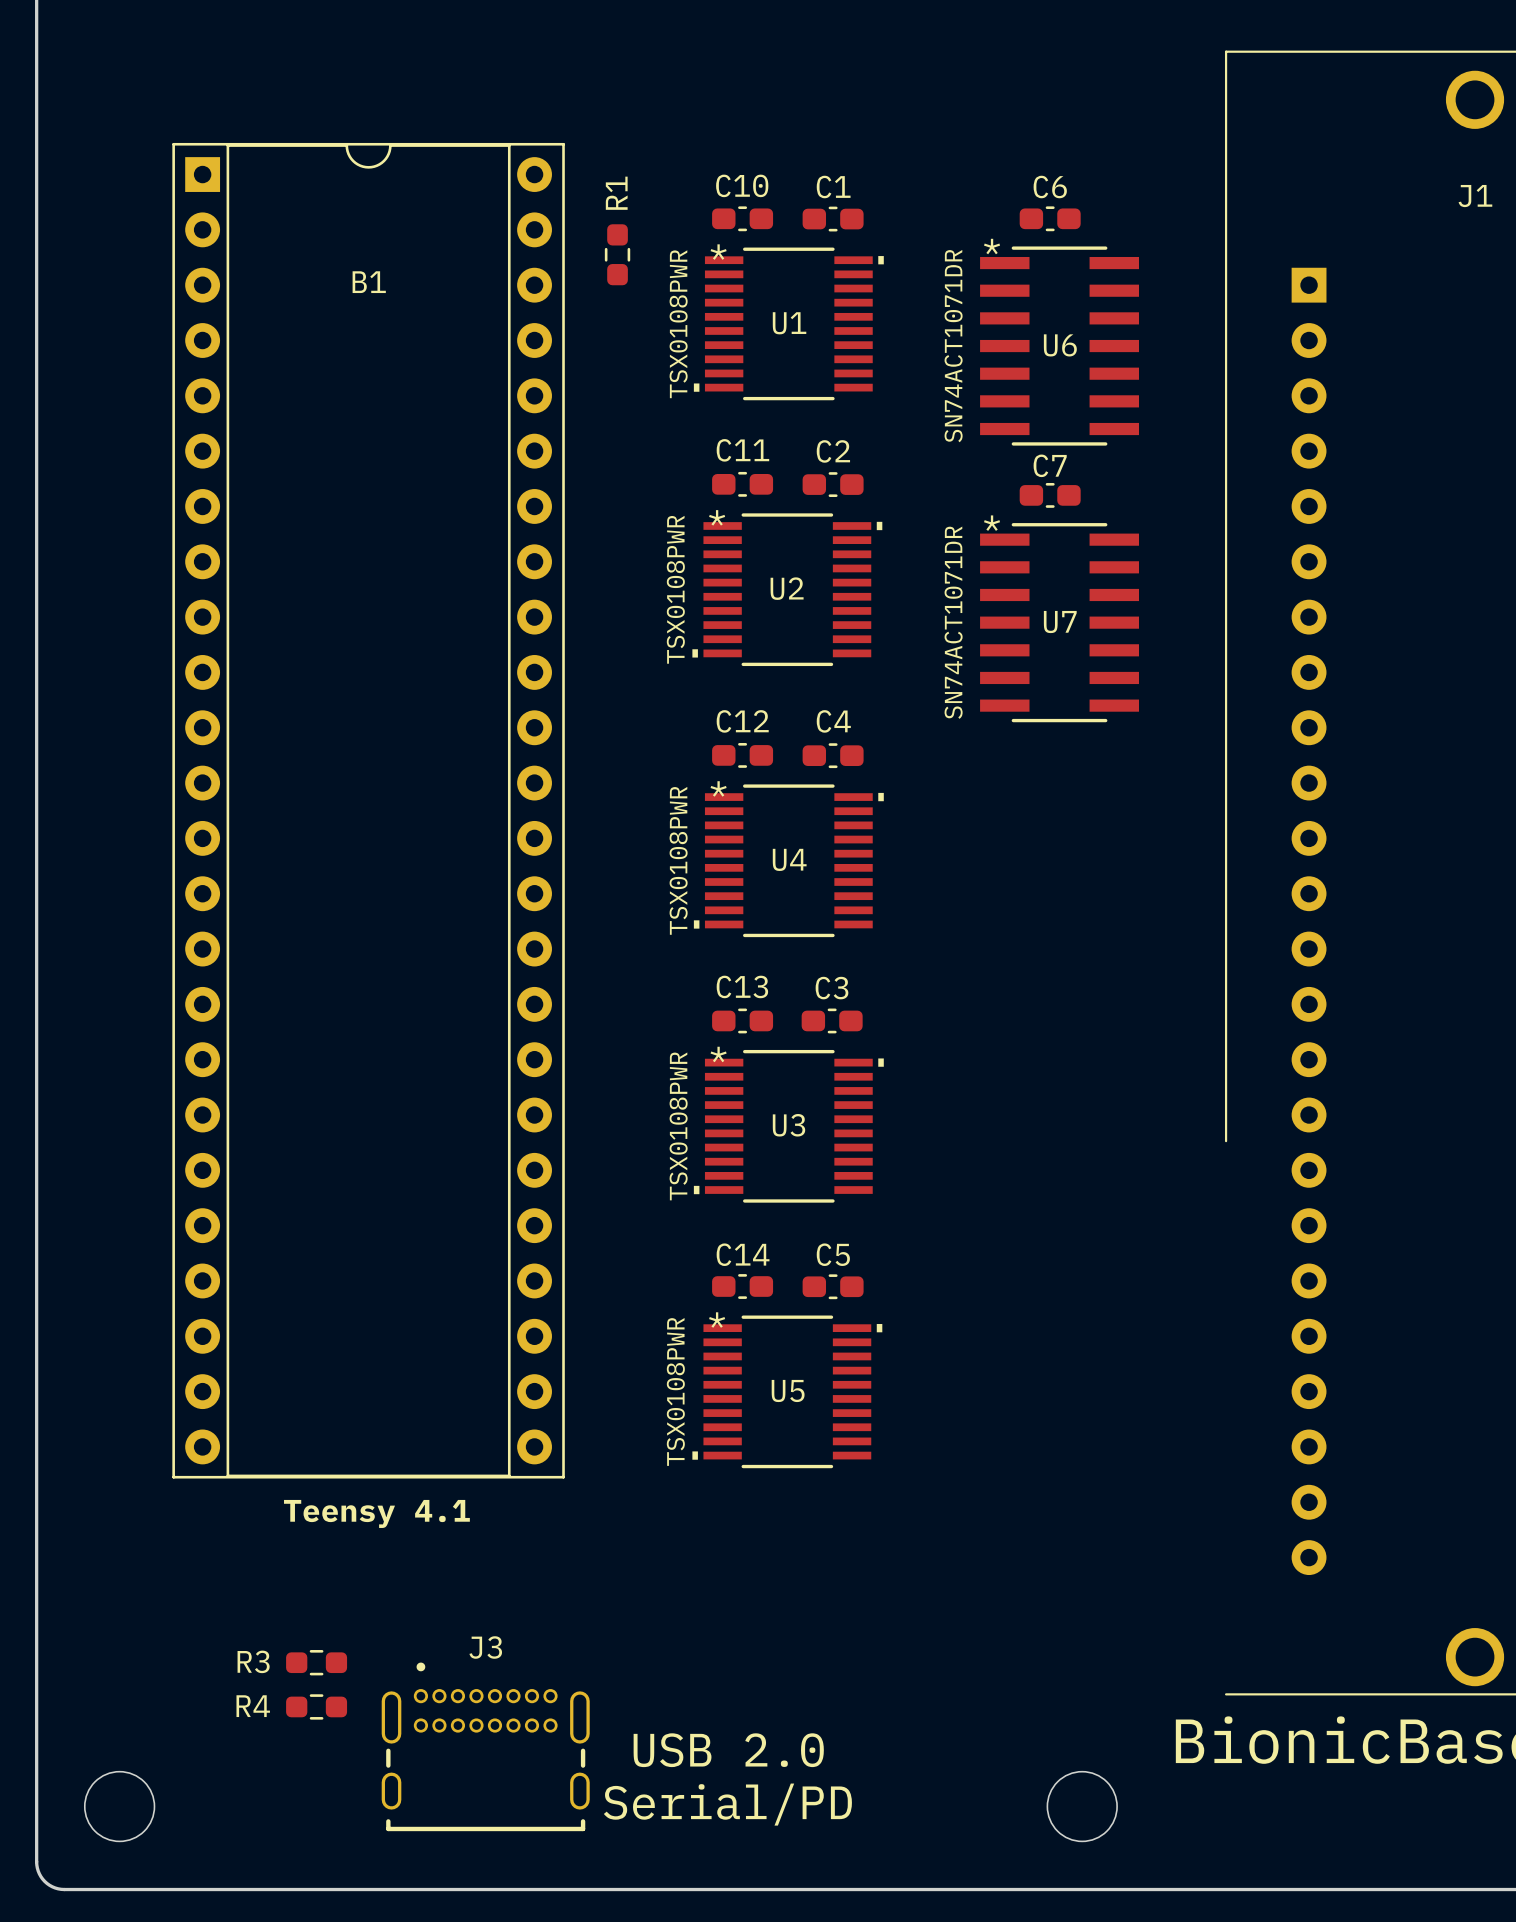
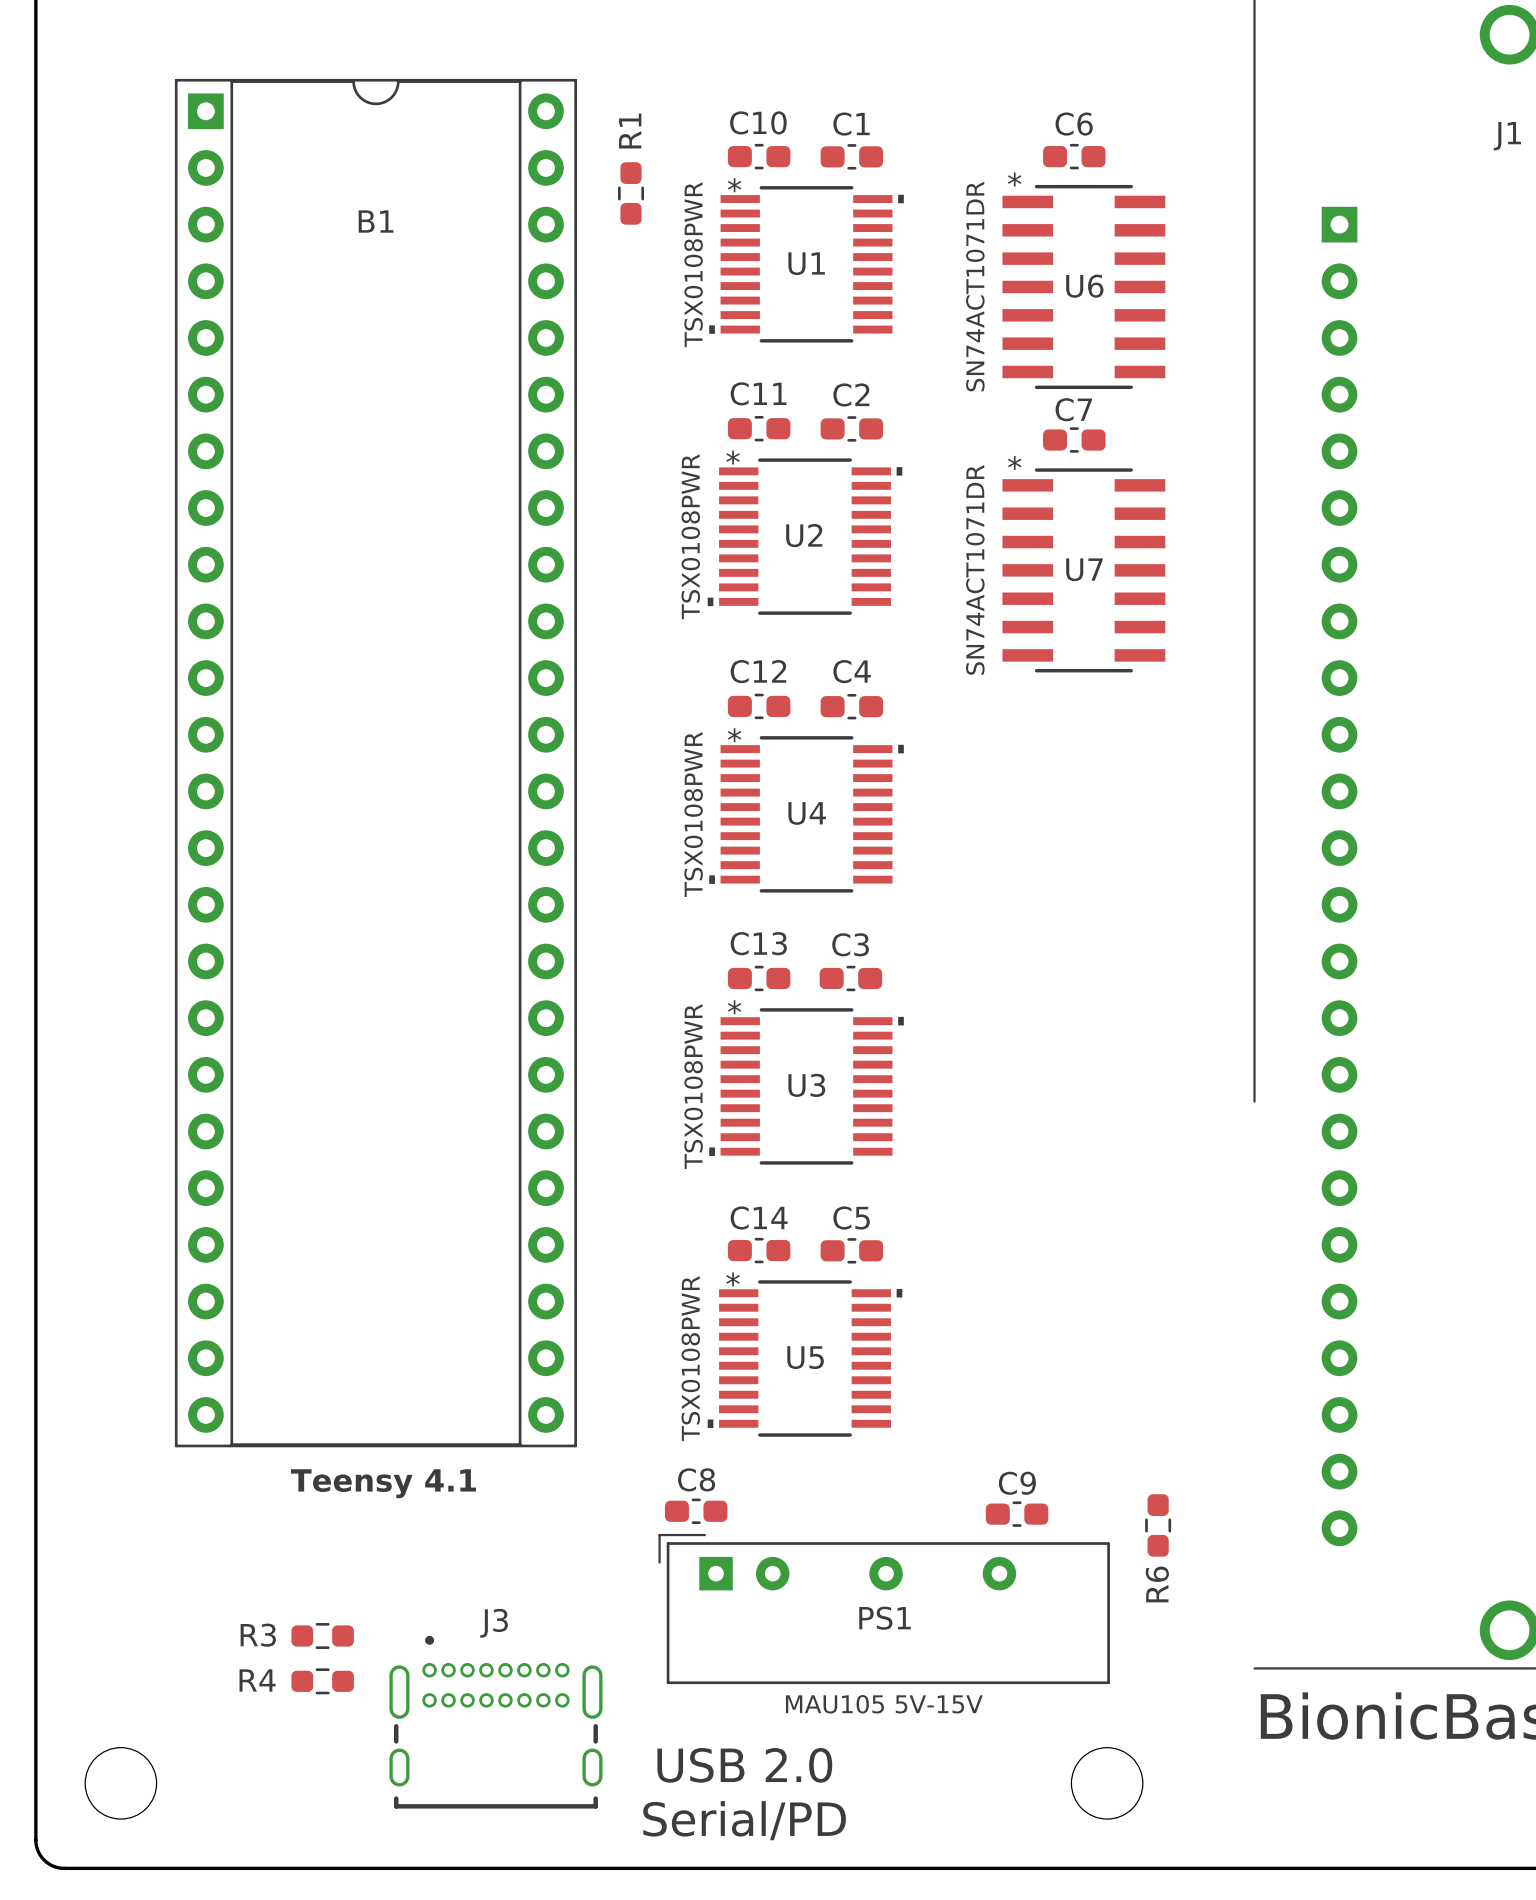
C8: none -> (696, 1511)
C9: none -> (1017, 1514)
R6: none -> (1158, 1525)
PS1: none -> (884, 1609)
text: none -> MAU105 5V-15V (884, 1704)
text position: USB 2.0 (728, 1750) -> USB 2.0 (744, 1765)
text position: Serial/PD (727, 1804) -> Serial/PD (744, 1820)

